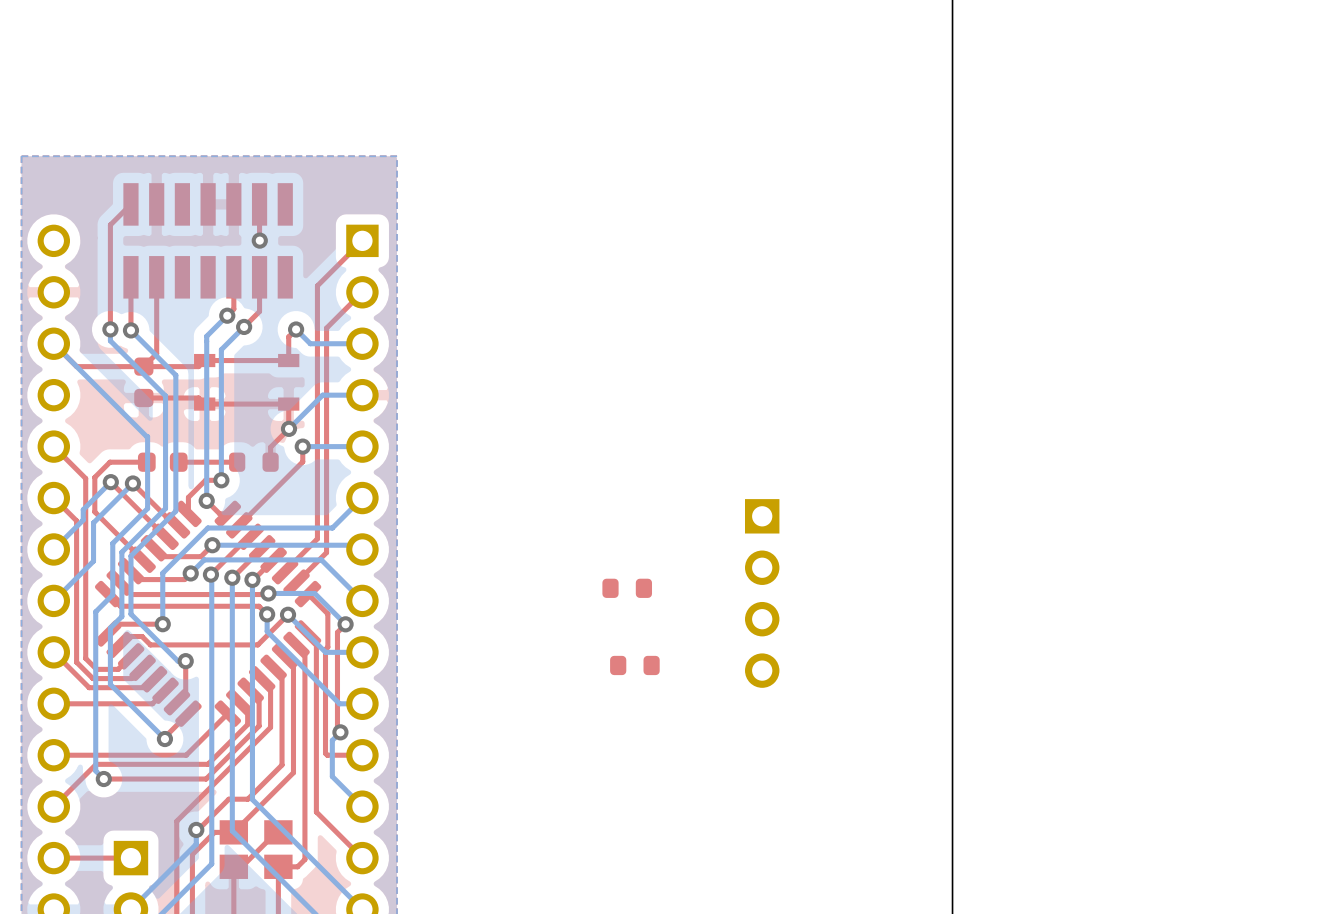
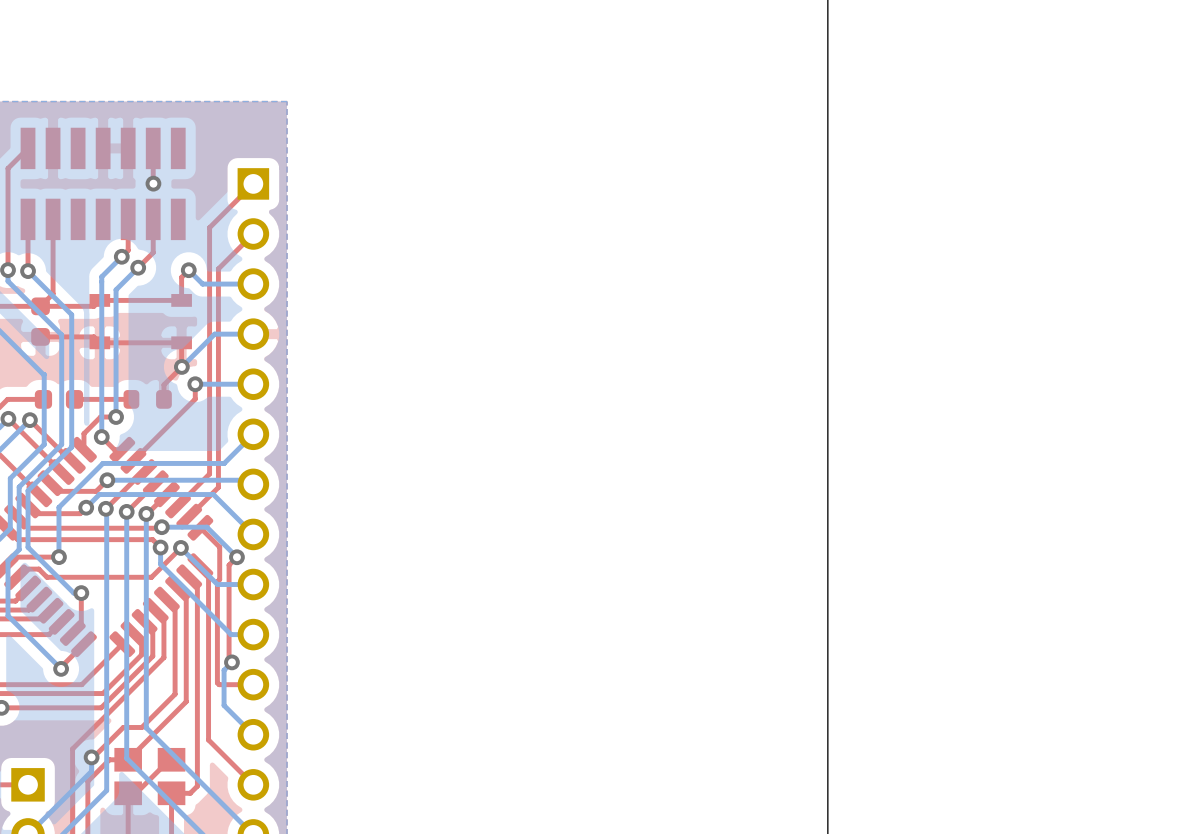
part: (627, 588) -> none
part: (762, 593) -> none
part: (634, 665) -> none

